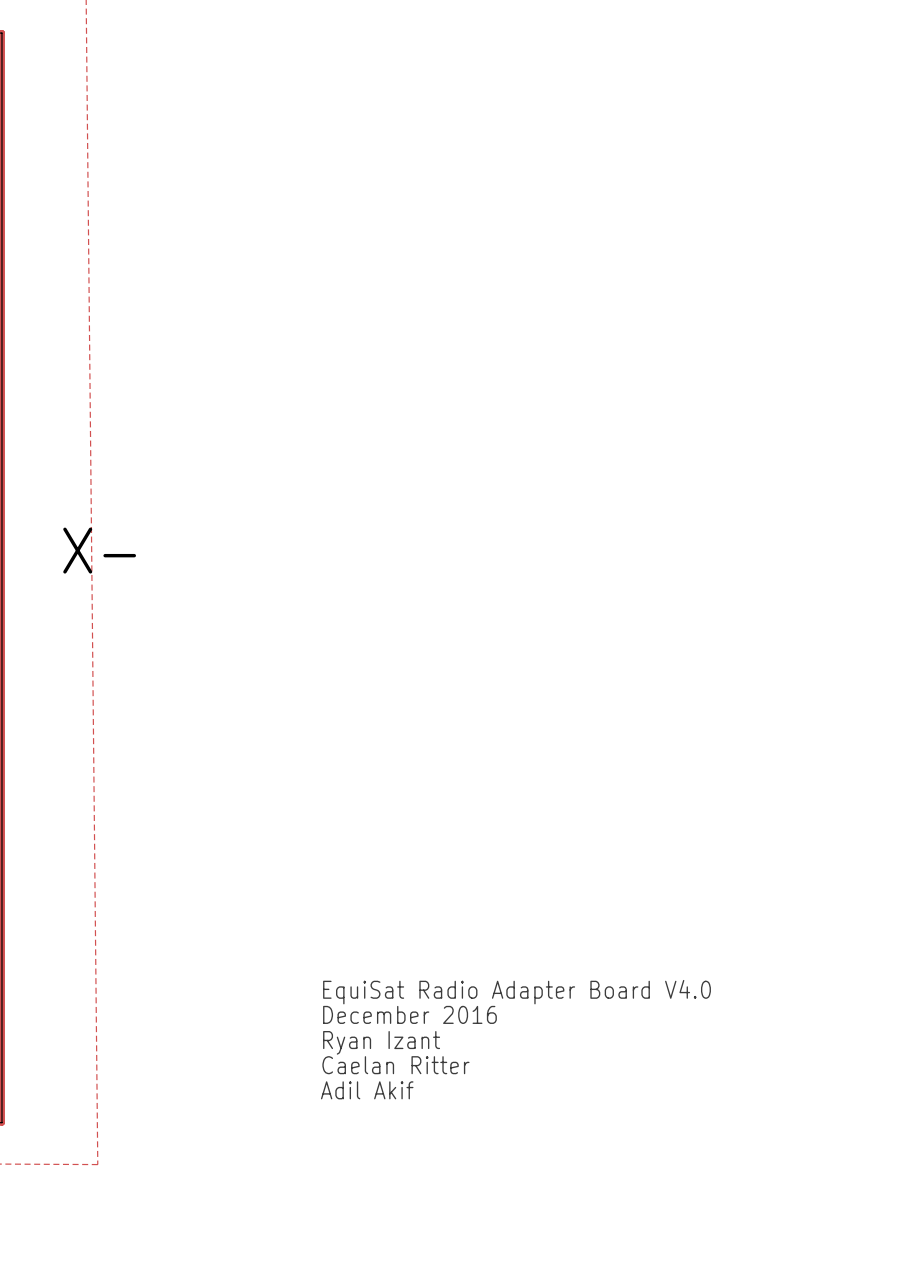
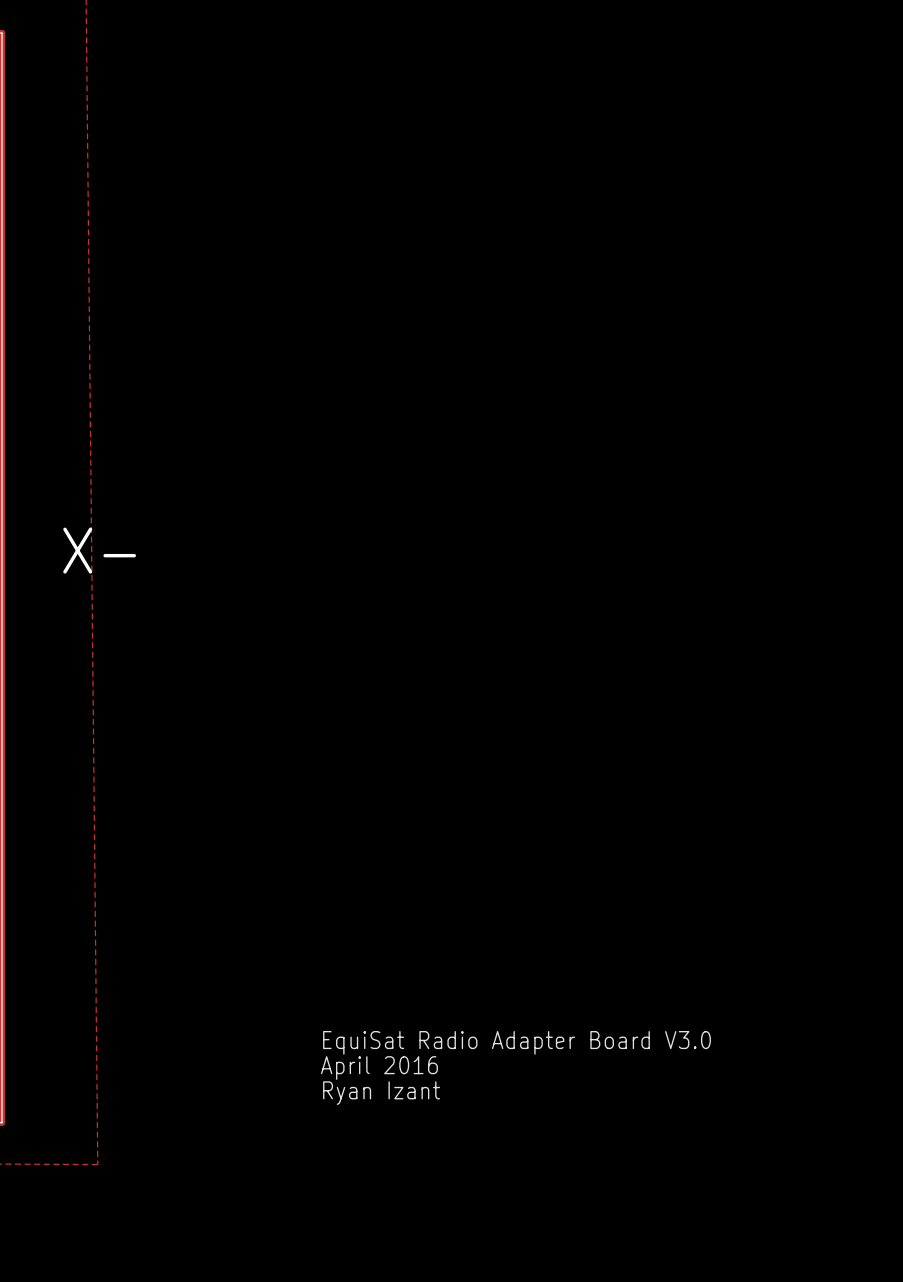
text: EquiSat Radio Adapter Board V4.0 (517, 992) -> none
text: December 2016 (409, 1014) -> none
text: Ryan Izant (381, 1042) -> EquiSat Radio Adapter Board V3.0 (517, 1042)
text: Caelan Ritter (395, 1065) -> April 2016 (379, 1067)
text: Adil Akif (367, 1090) -> Ryan Izant (381, 1093)

